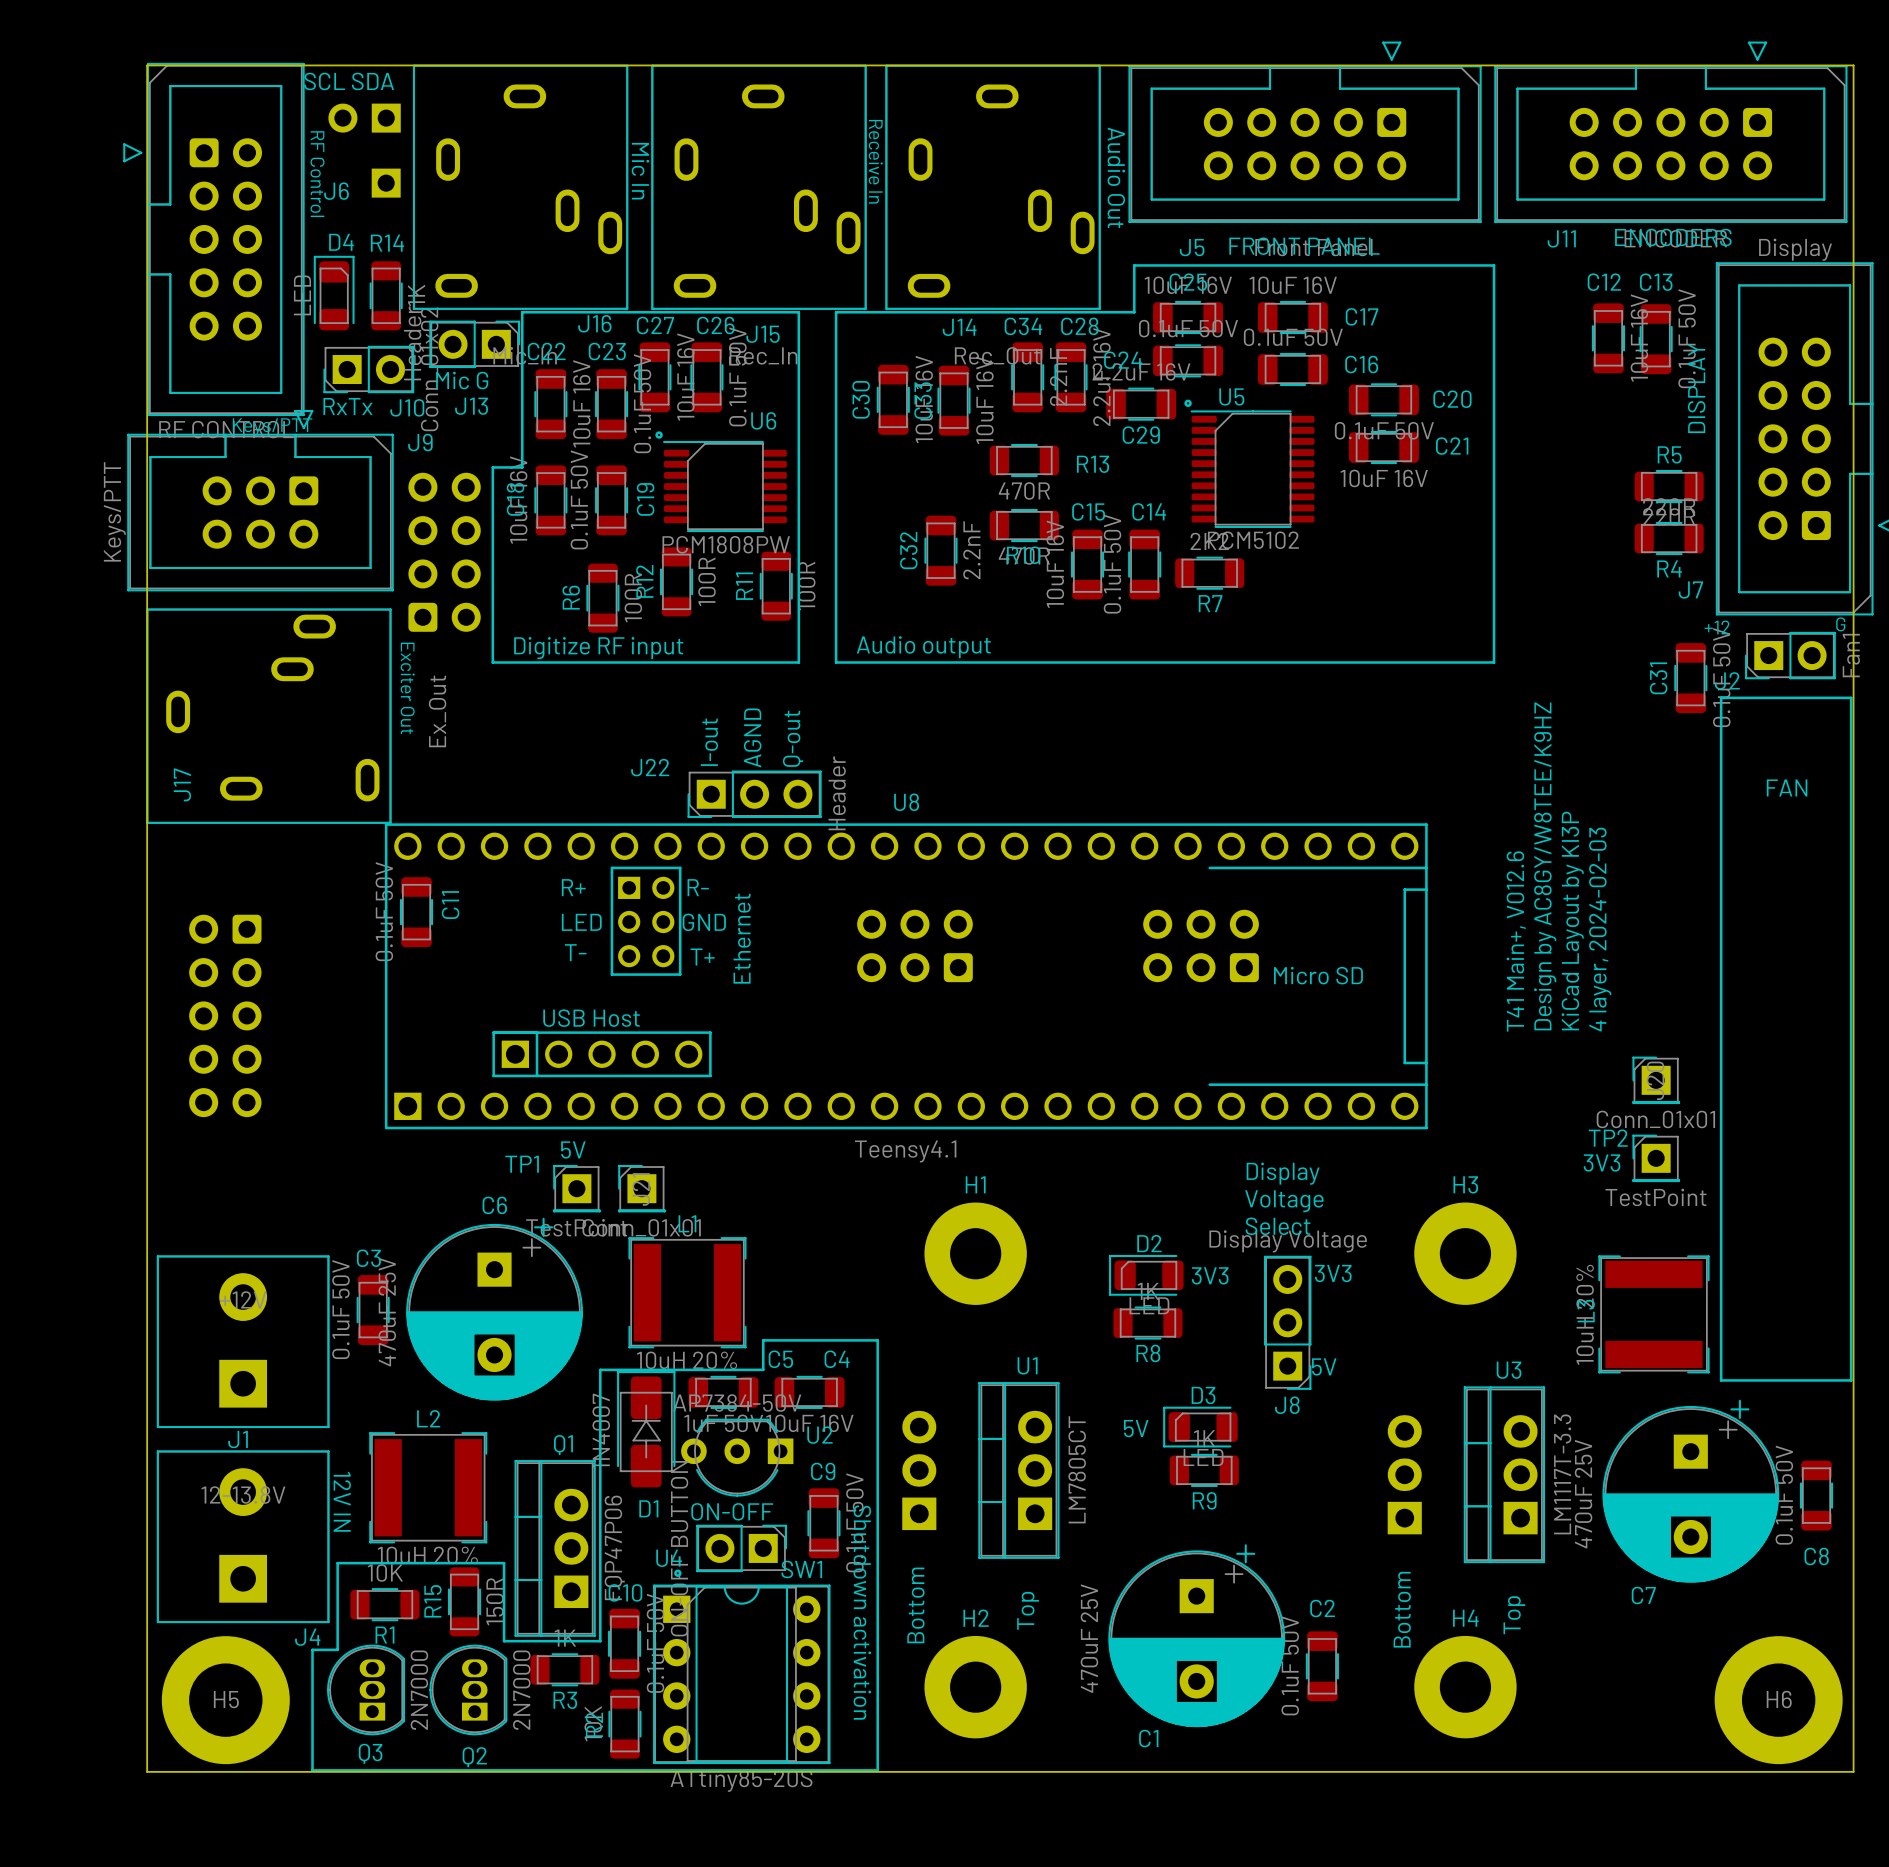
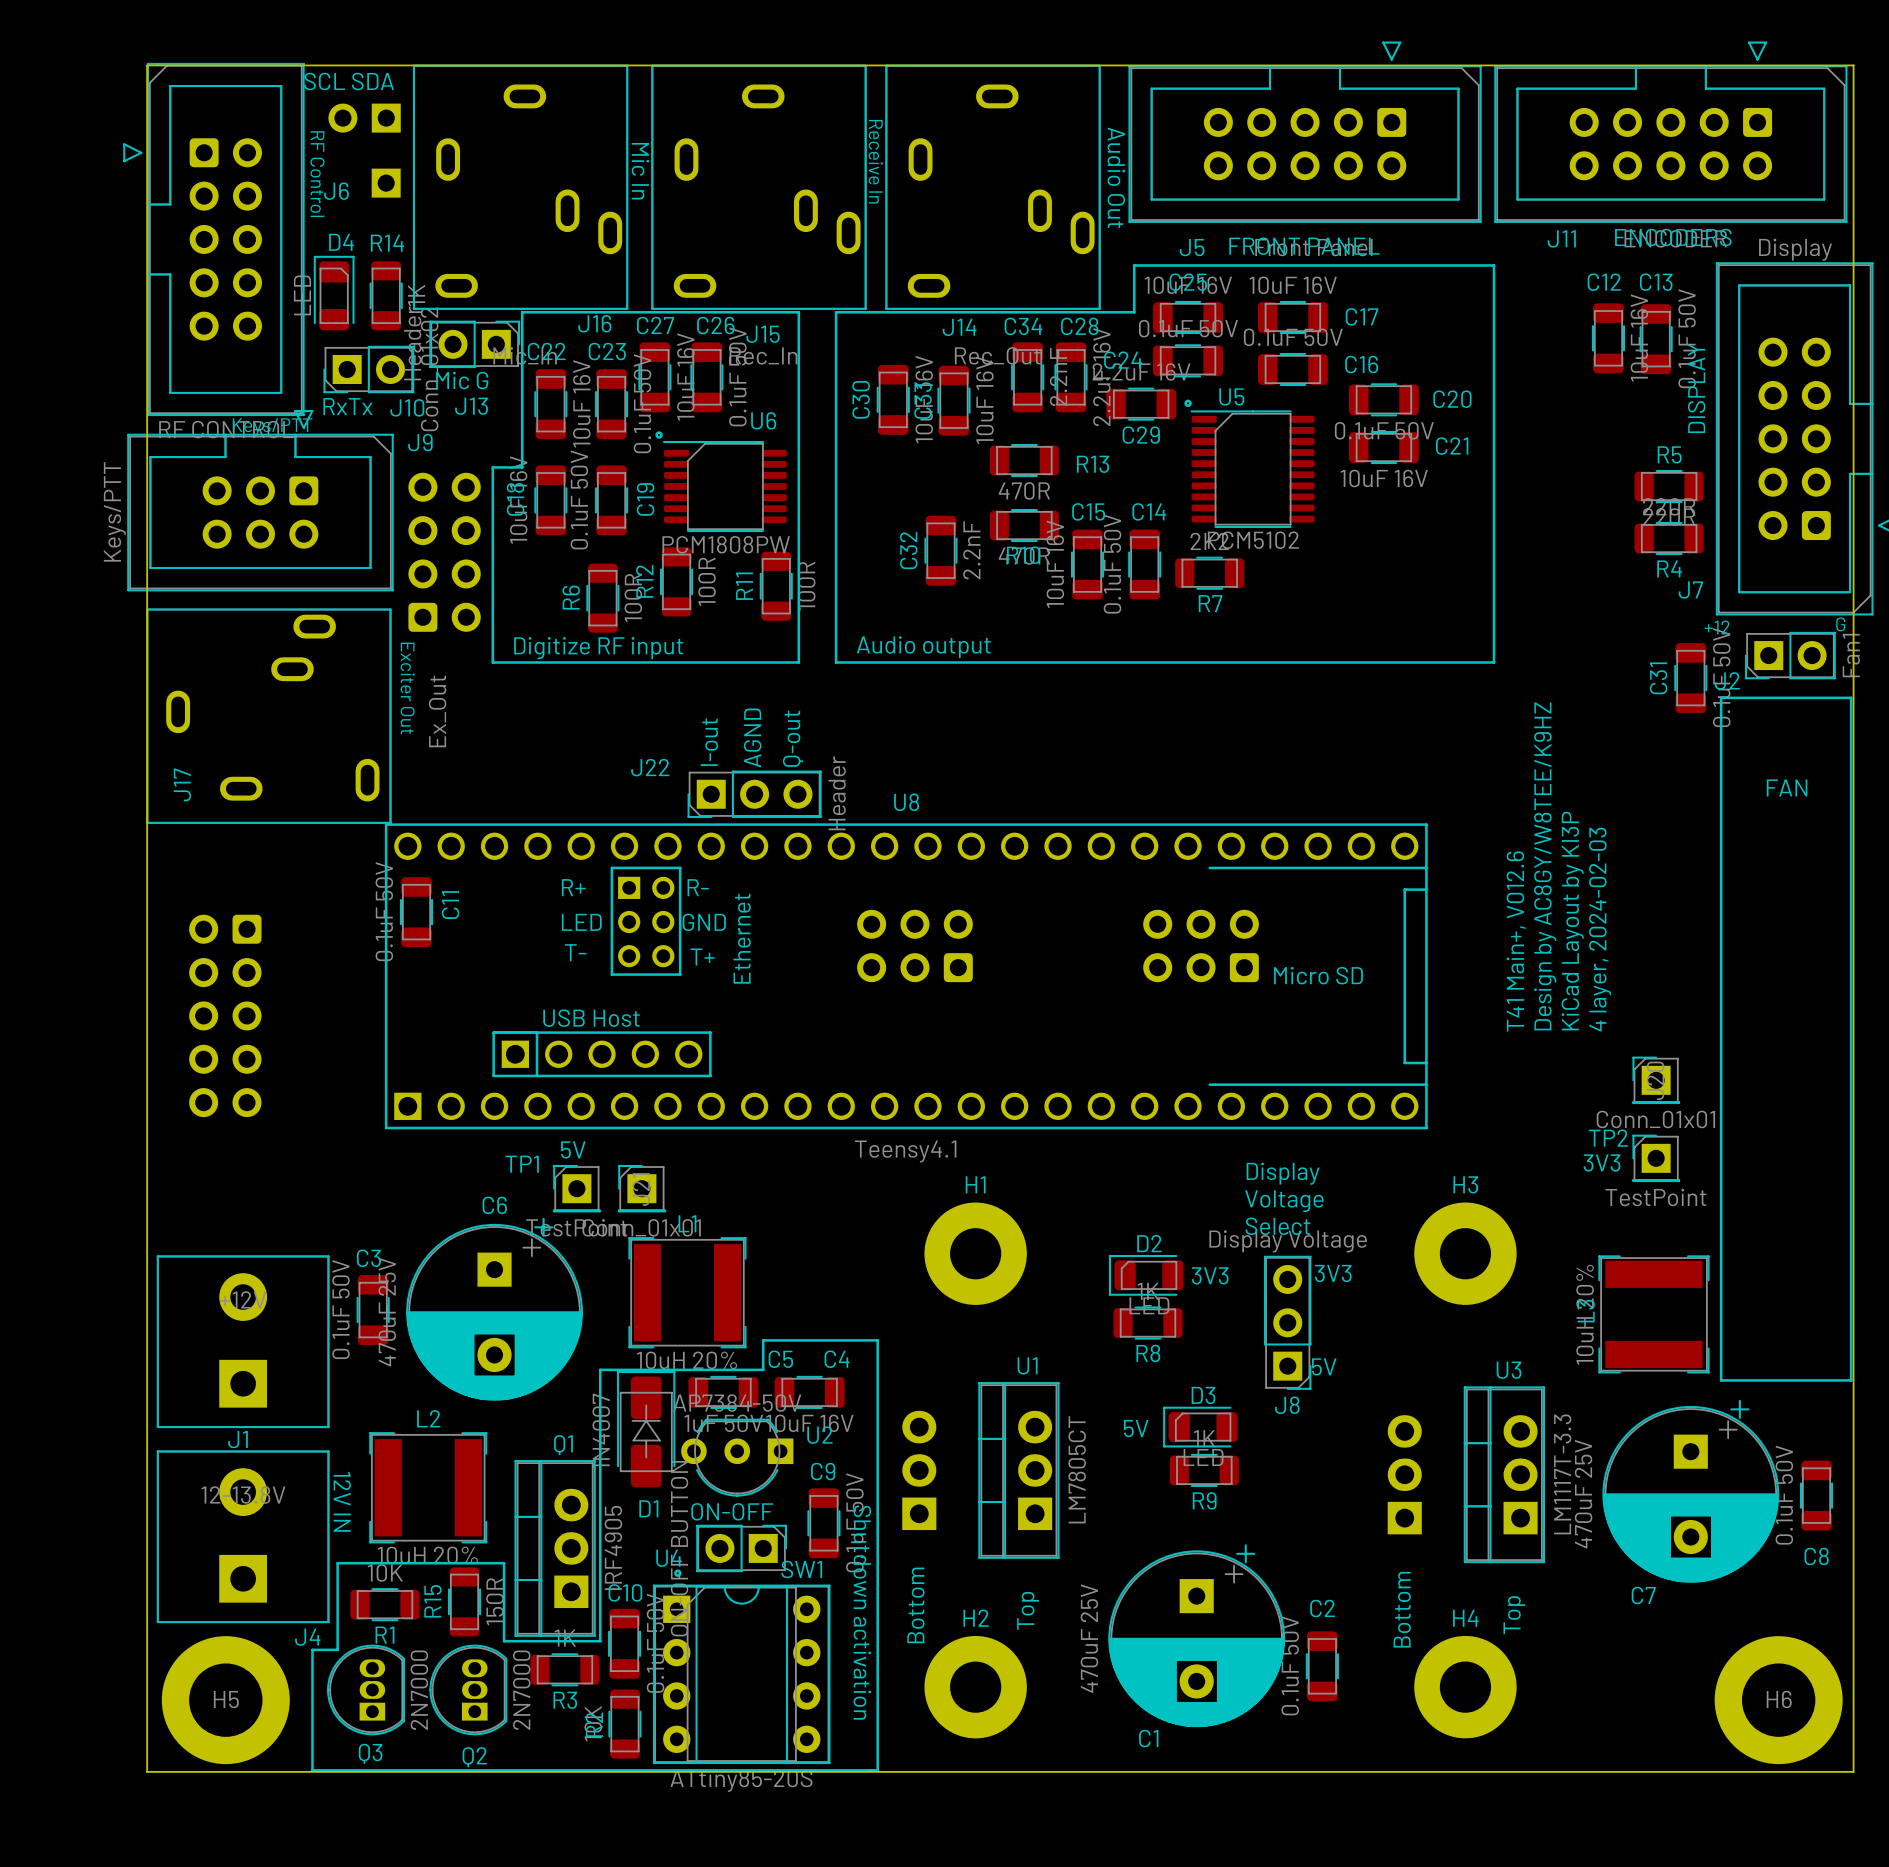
Q1 value: FQP47P06 (614, 1547) -> IRF4905 (613, 1547)

